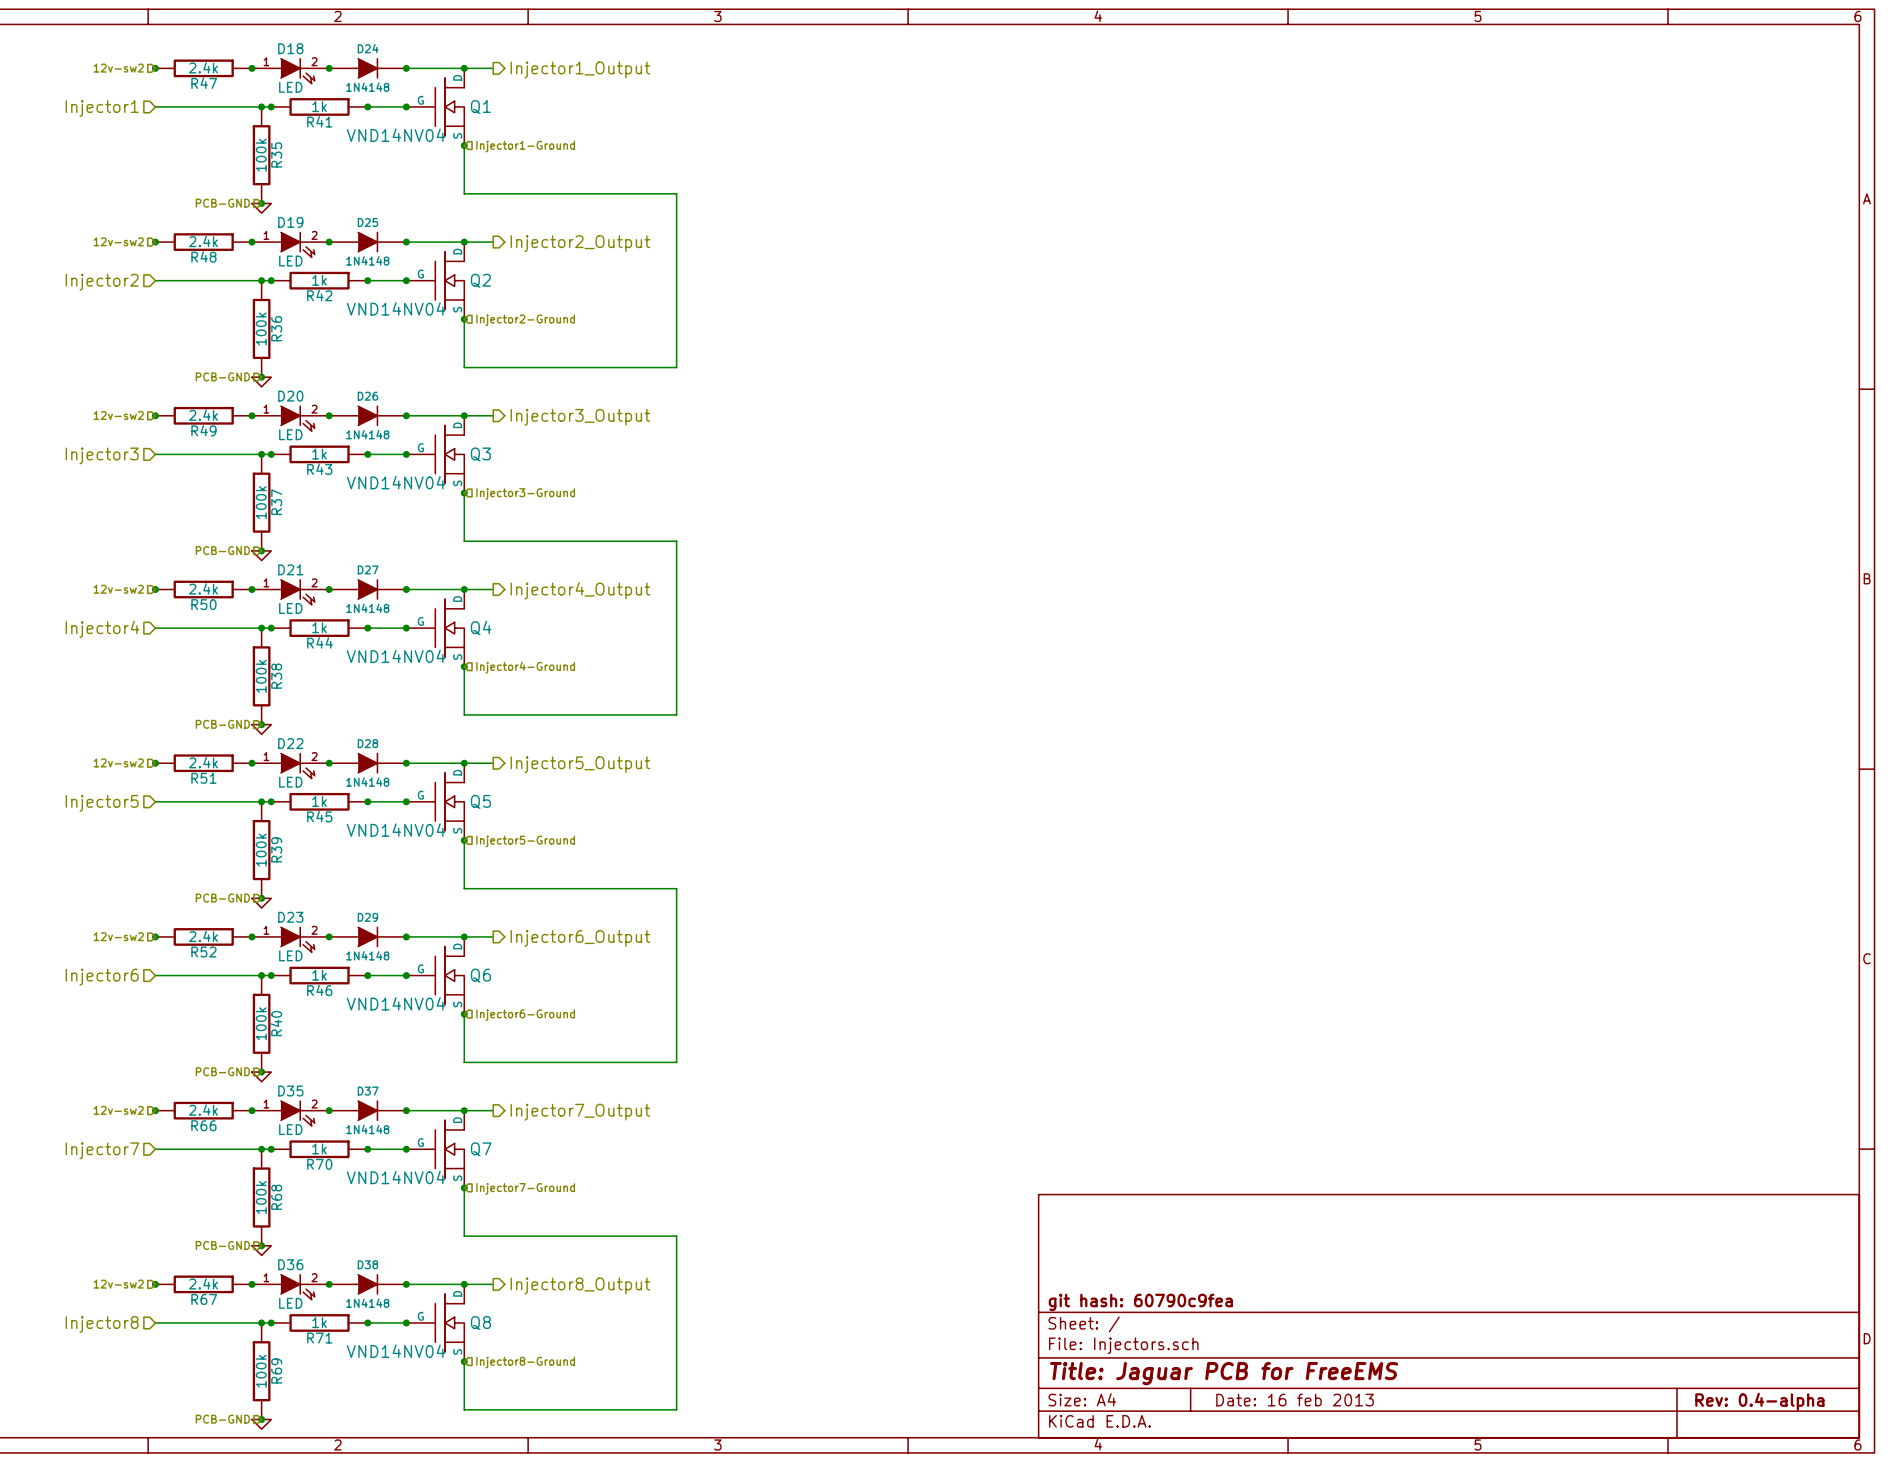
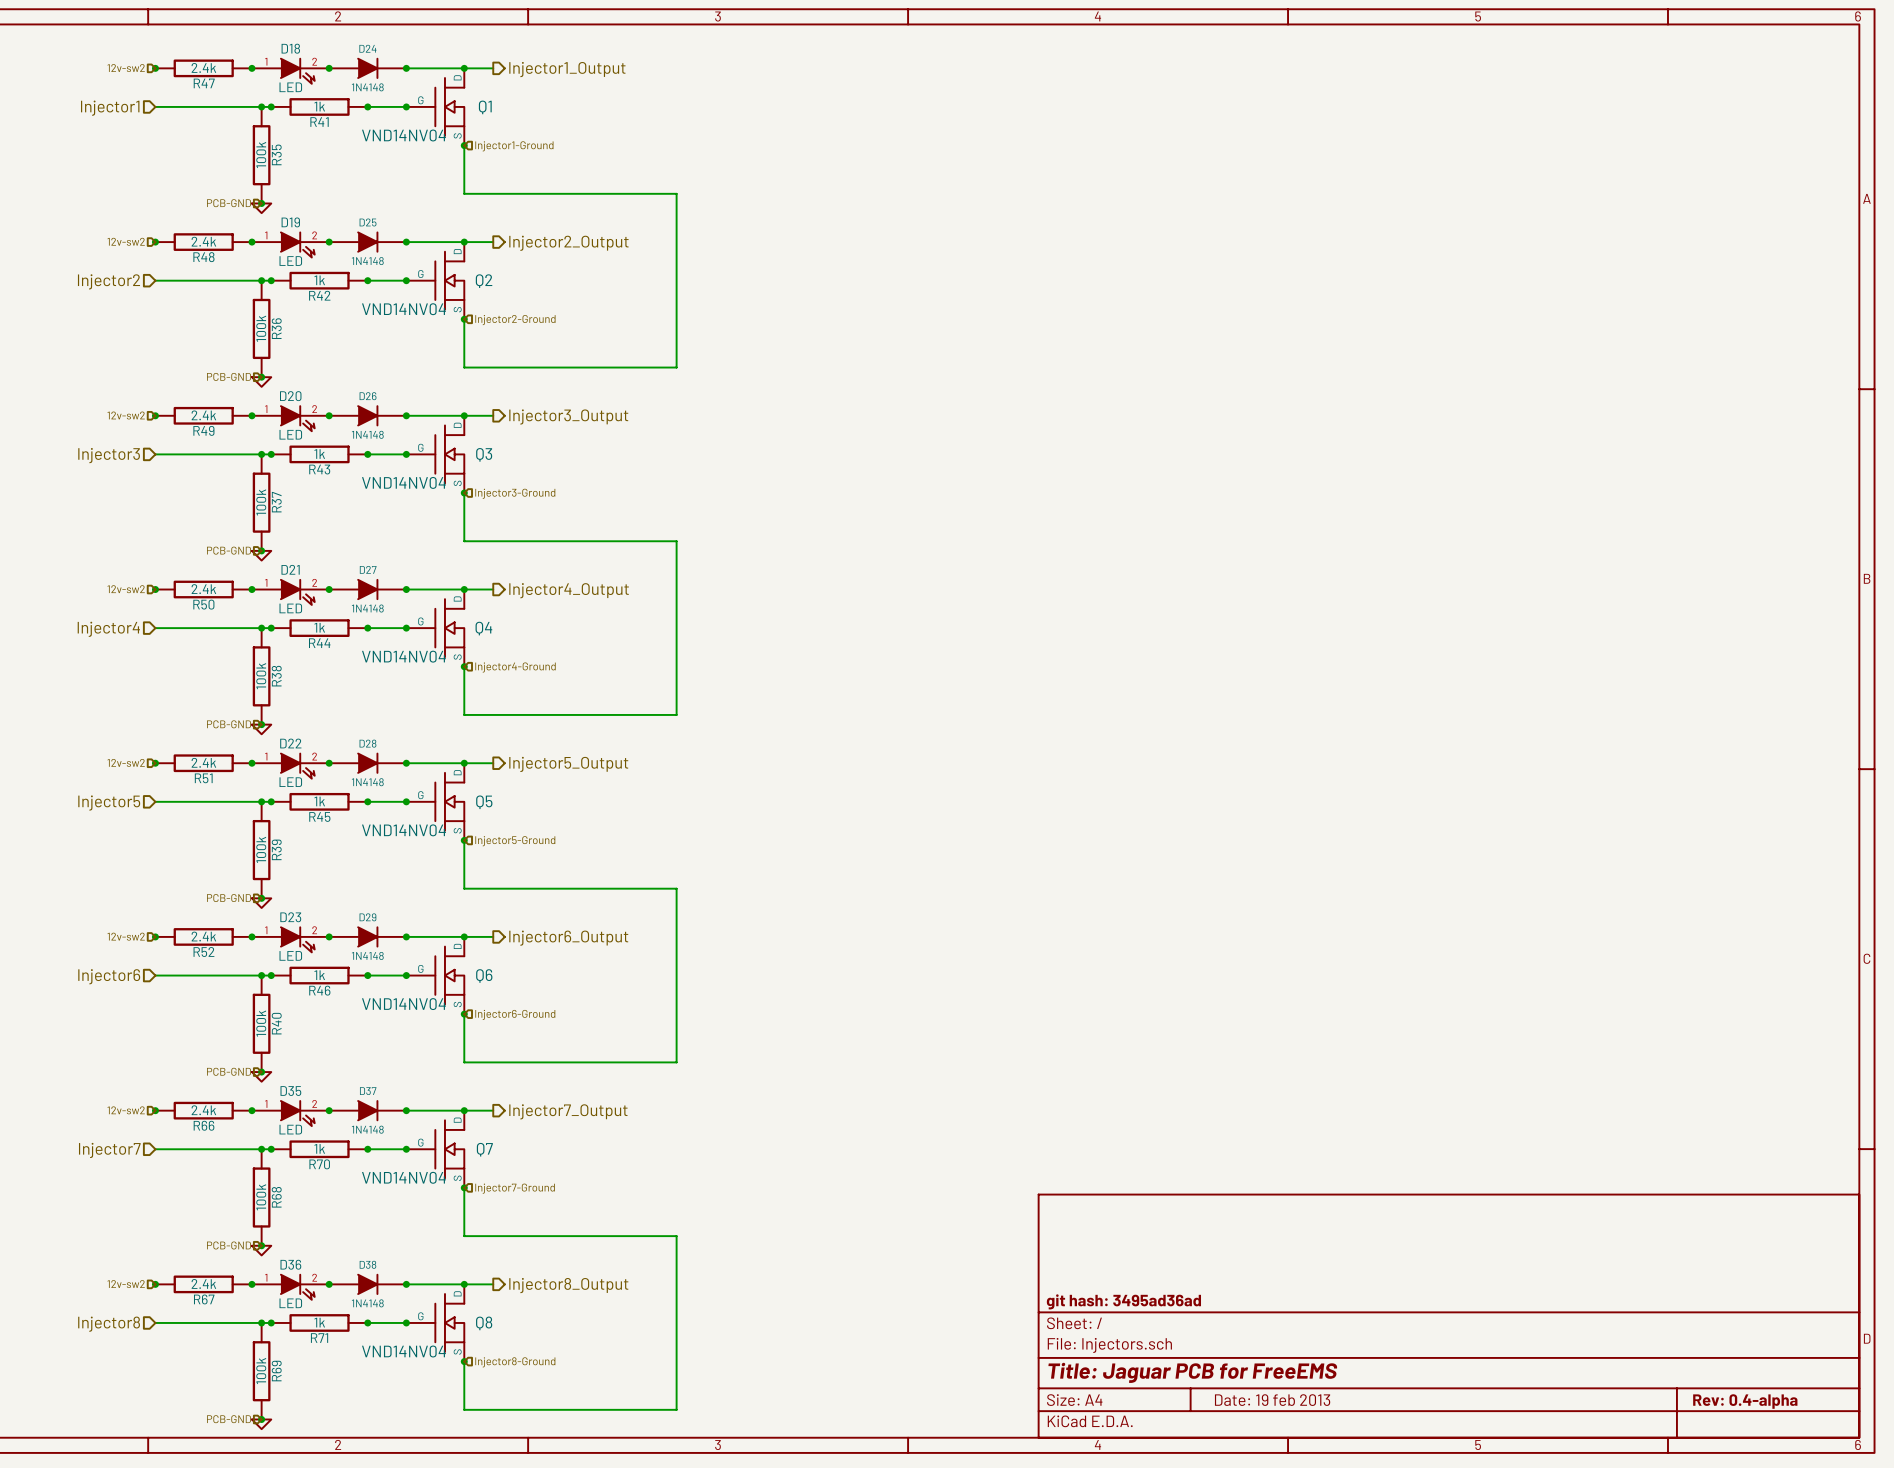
title block: git hash: 60790c9fea (1140, 1302) -> git hash: 3495ad36ad (1123, 1301)
title block: Date: 16 feb 2013 (1295, 1400) -> Date: 19 feb 2013 (1272, 1400)

